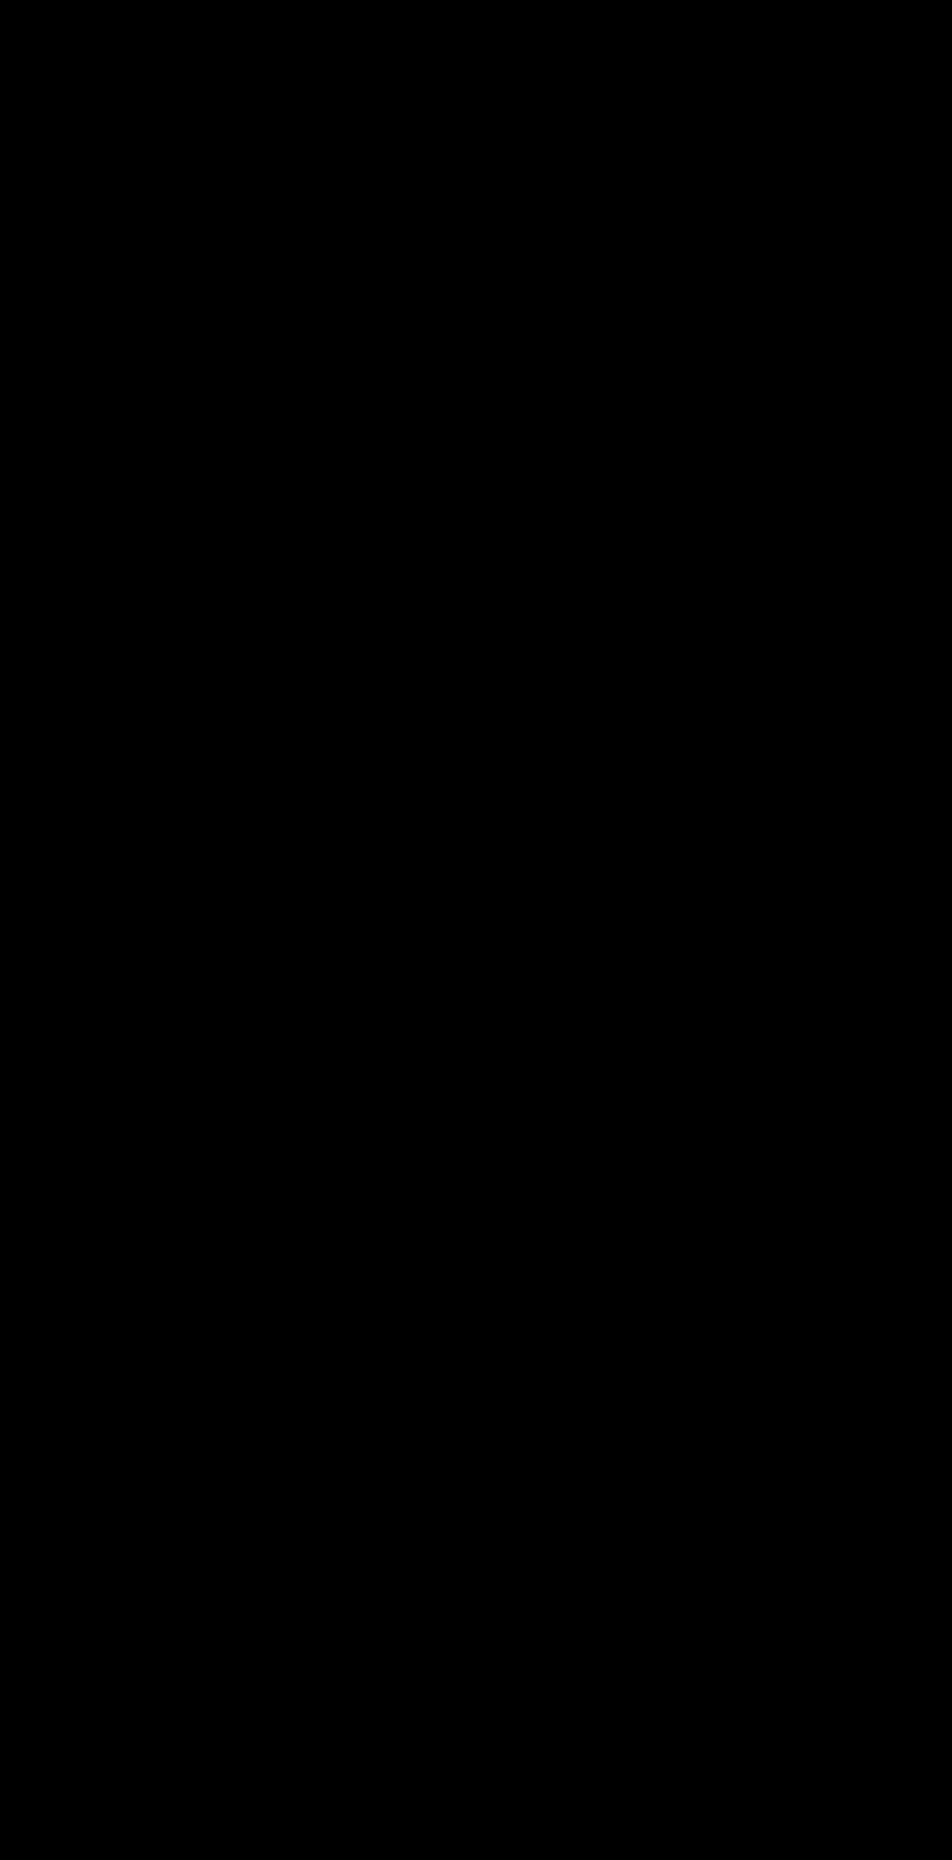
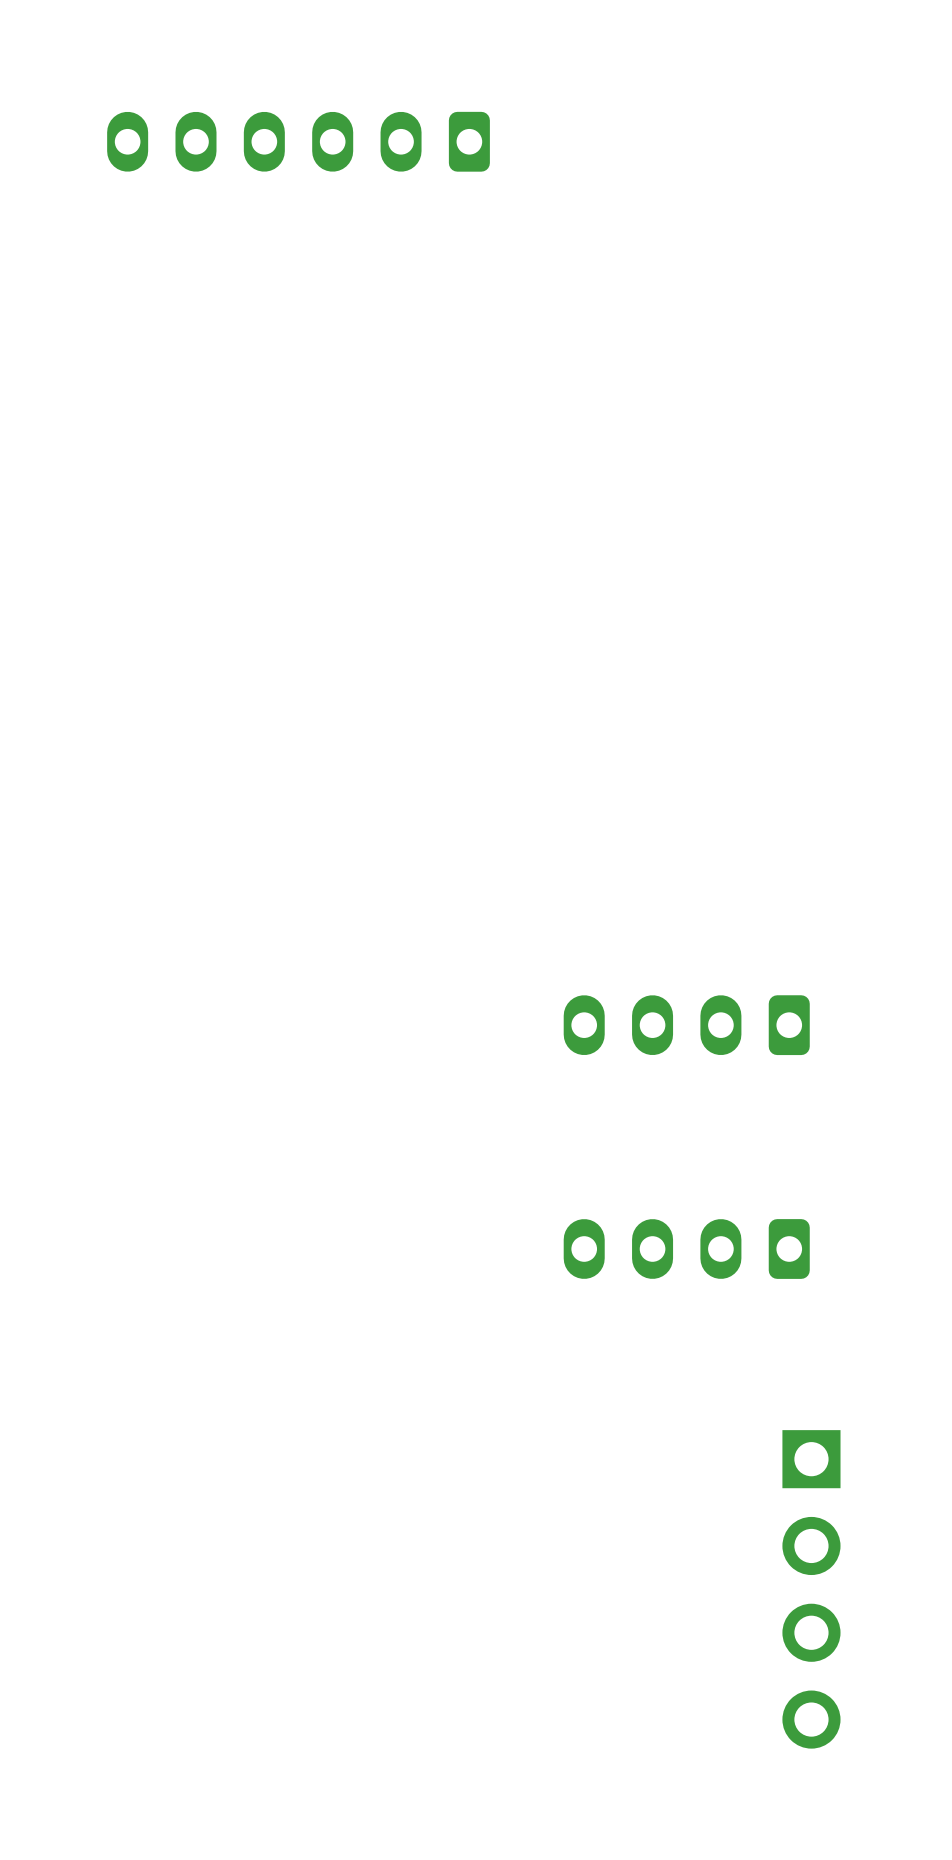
part: none -> (298, 141)
part: none -> (686, 1025)
part: none -> (686, 1249)
part: none -> (811, 1589)

